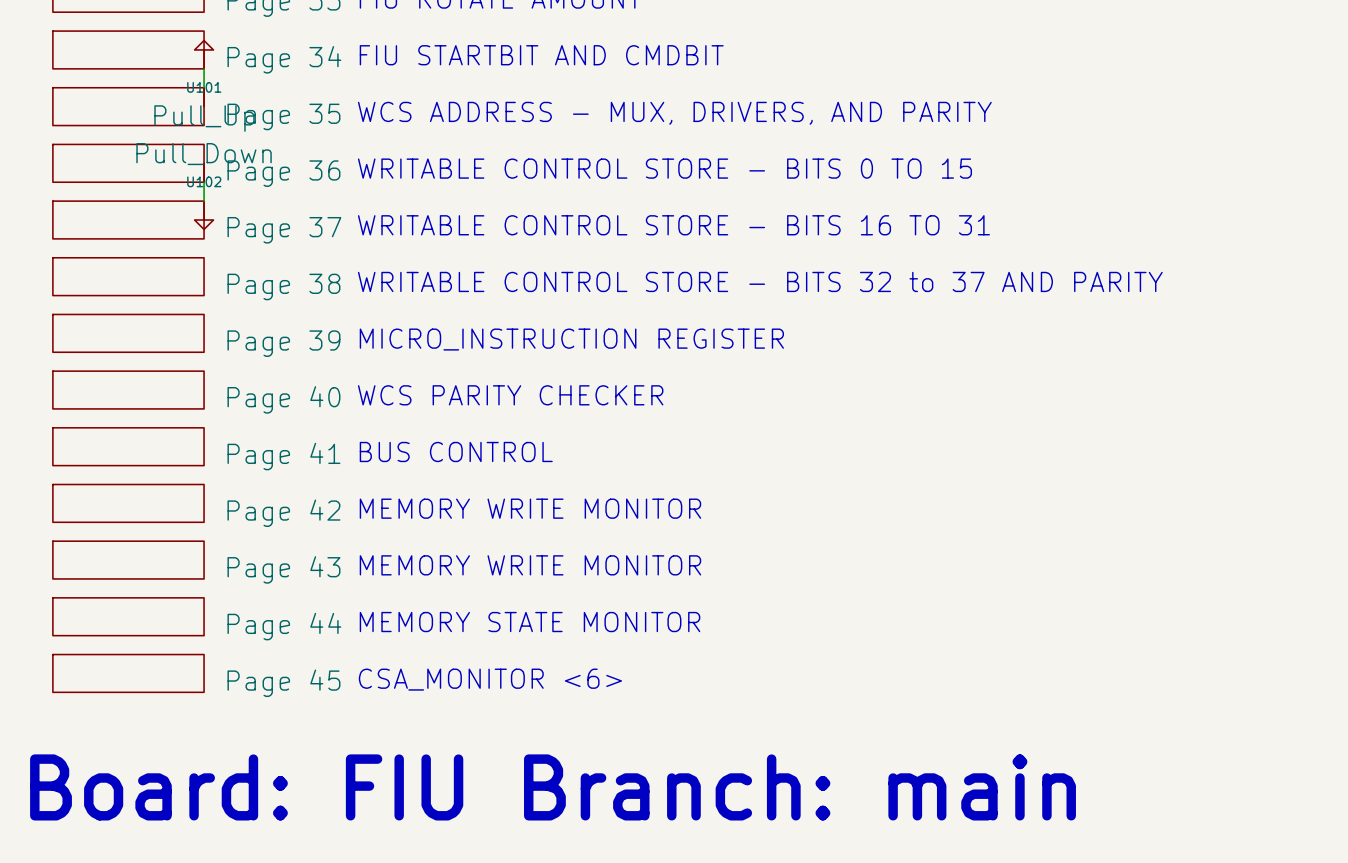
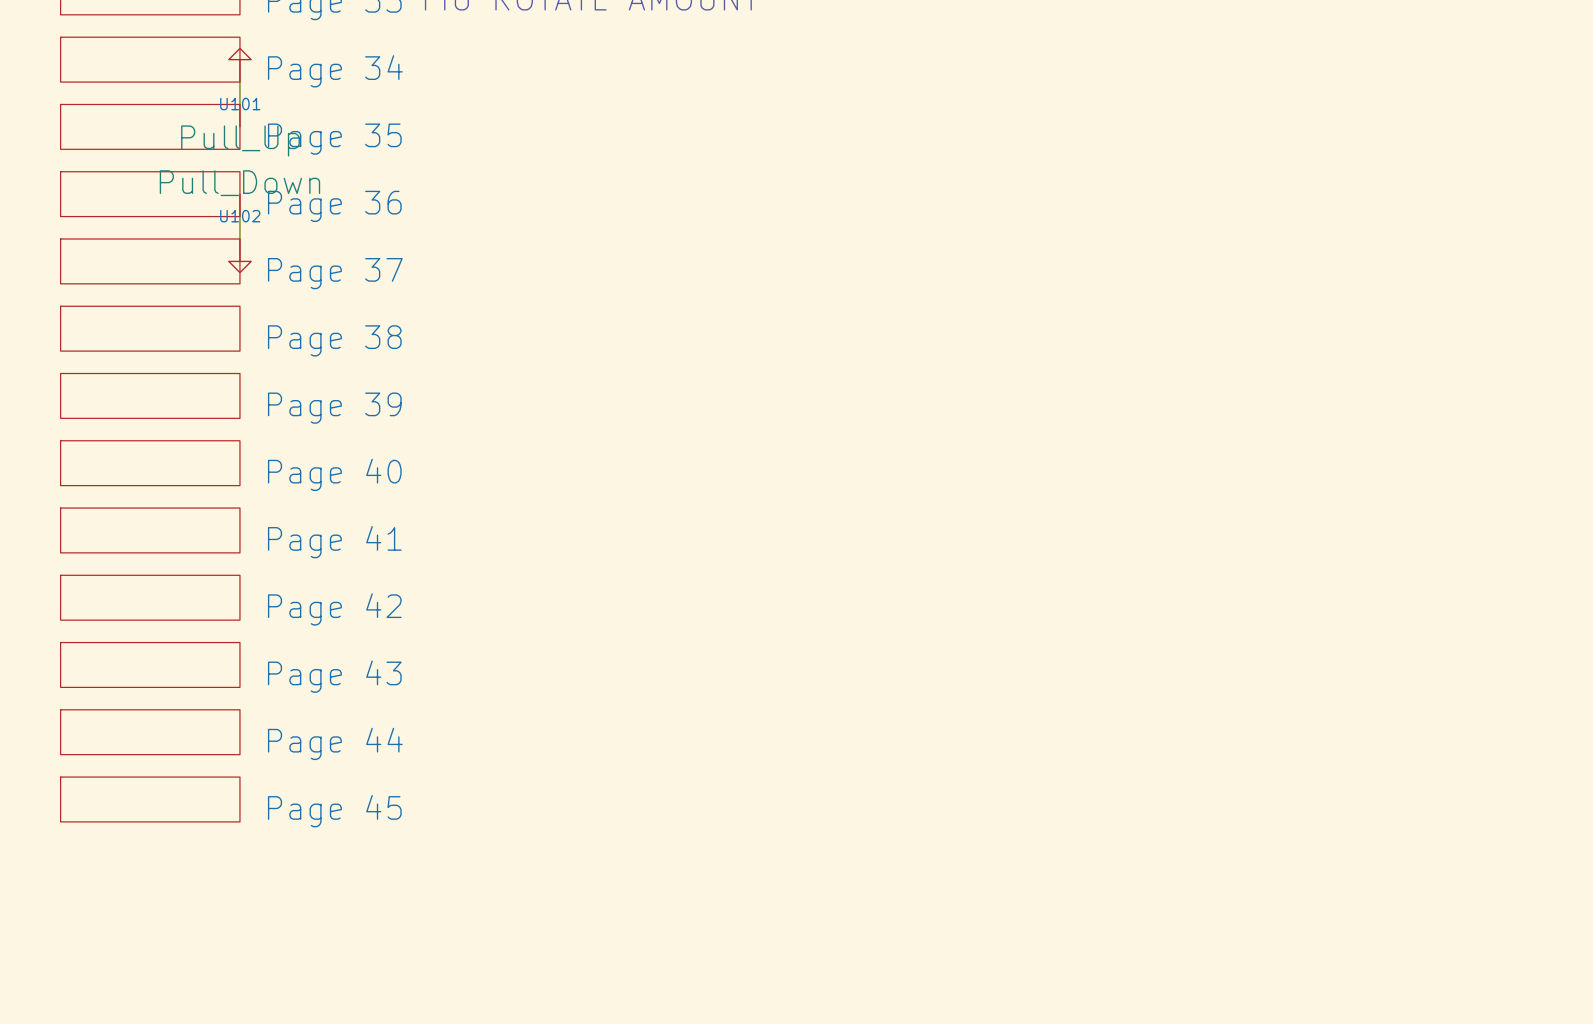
text: FIU STARTBIT AND CMDBIT (541, 55) -> none
text: WCS ADDRESS - MUX, DRIVERS, AND PARITY (674, 113) -> none
text: WRITABLE CONTROL STORE - BITS 0 TO 15 (664, 168) -> none
text: WRITABLE CONTROL STORE - BITS 16 TO 31 (673, 225) -> none
text: WRITABLE CONTROL STORE - BITS 32 to 37 AND PARITY (760, 281) -> none
text: MICRO_INSTRUCTION REGISTER (571, 339) -> none
text: WCS PARITY CHECKER (510, 395) -> none
text: BUS CONTROL (456, 451) -> none
text: MEMORY WRITE MONITOR (530, 508) -> none
text: MEMORY WRITE MONITOR (530, 565) -> none
text: MEMORY STATE MONITOR (530, 622) -> none
text: CSA_MONITOR <6> (490, 679) -> none
text: Board: FIU Branch: main (553, 787) -> none

